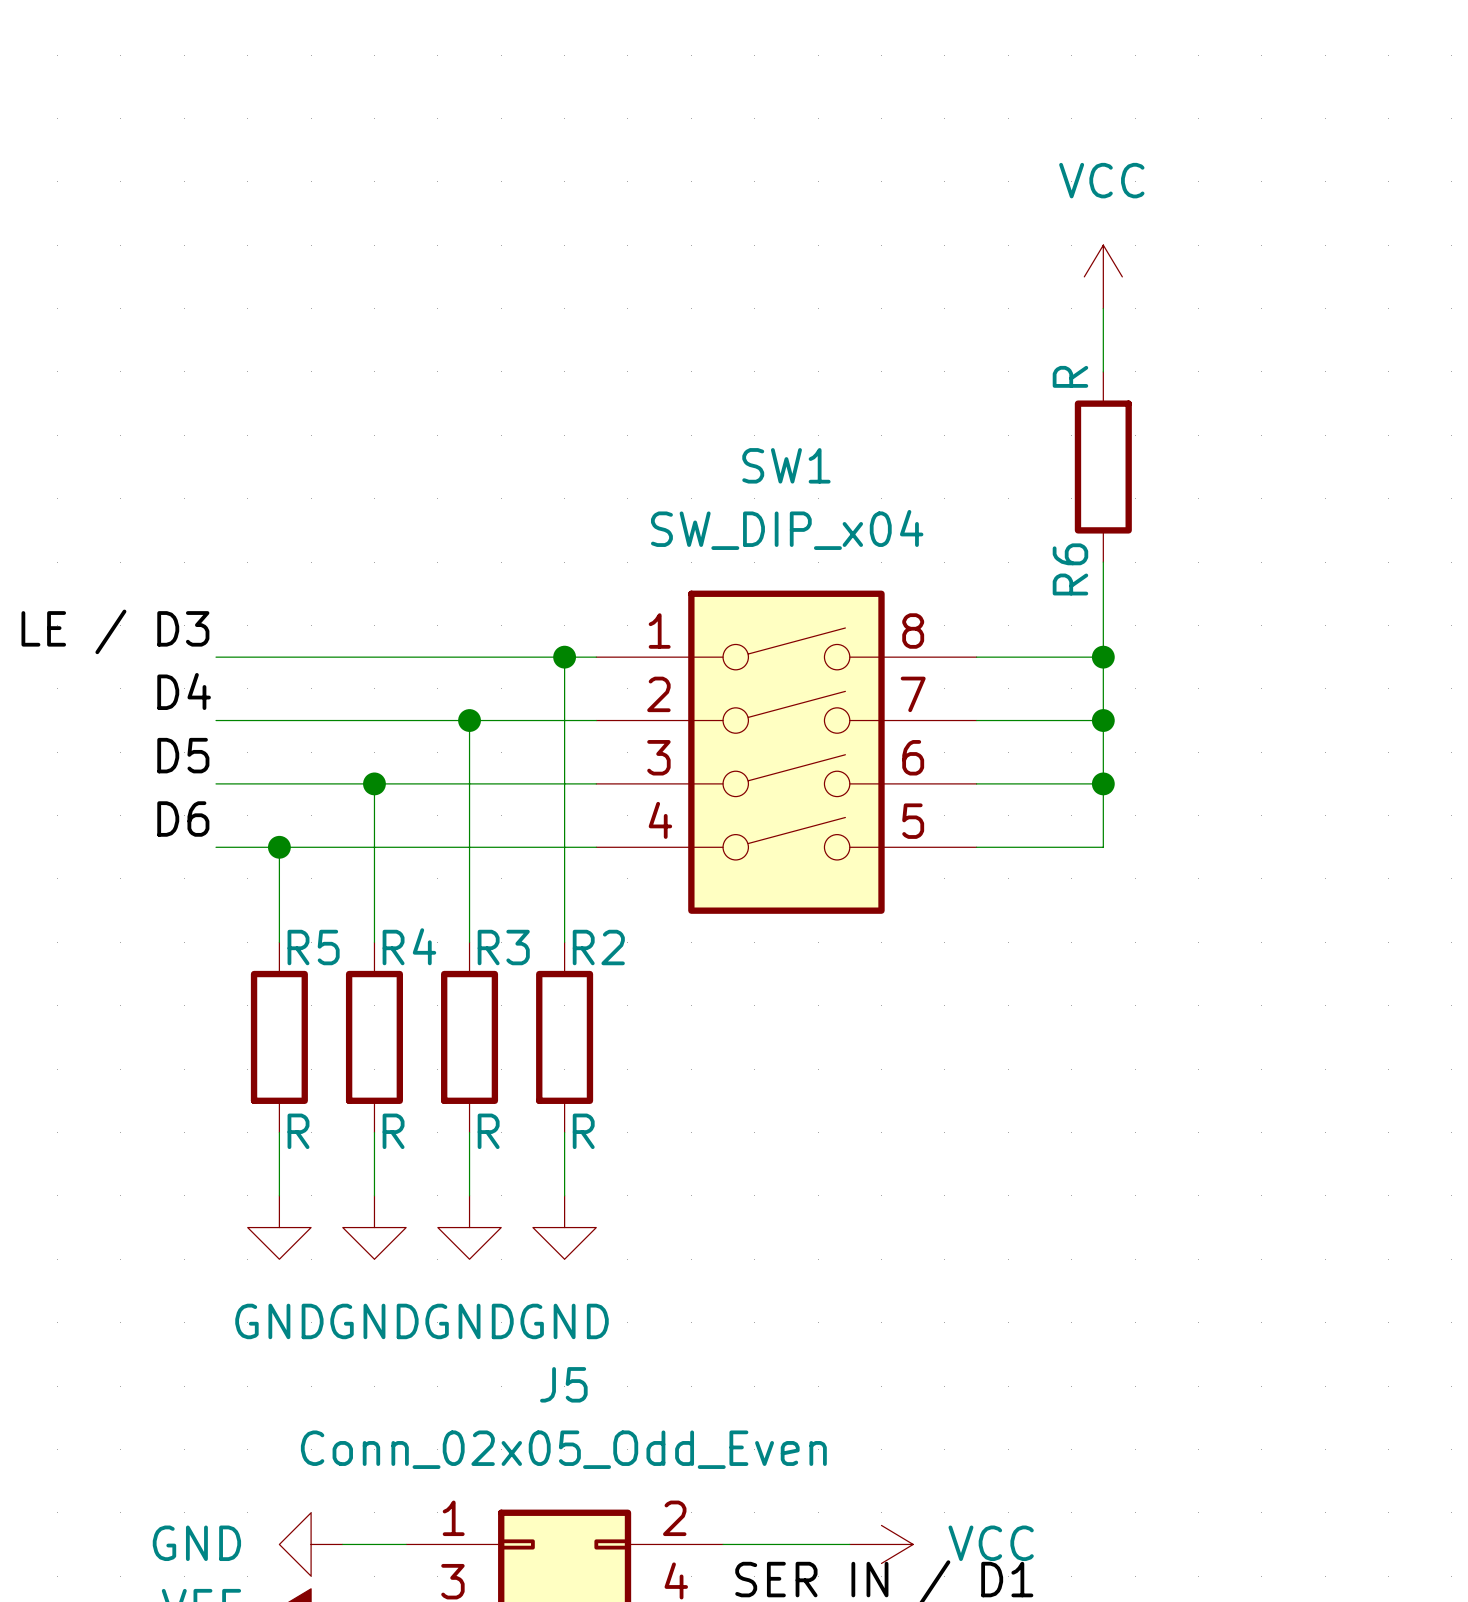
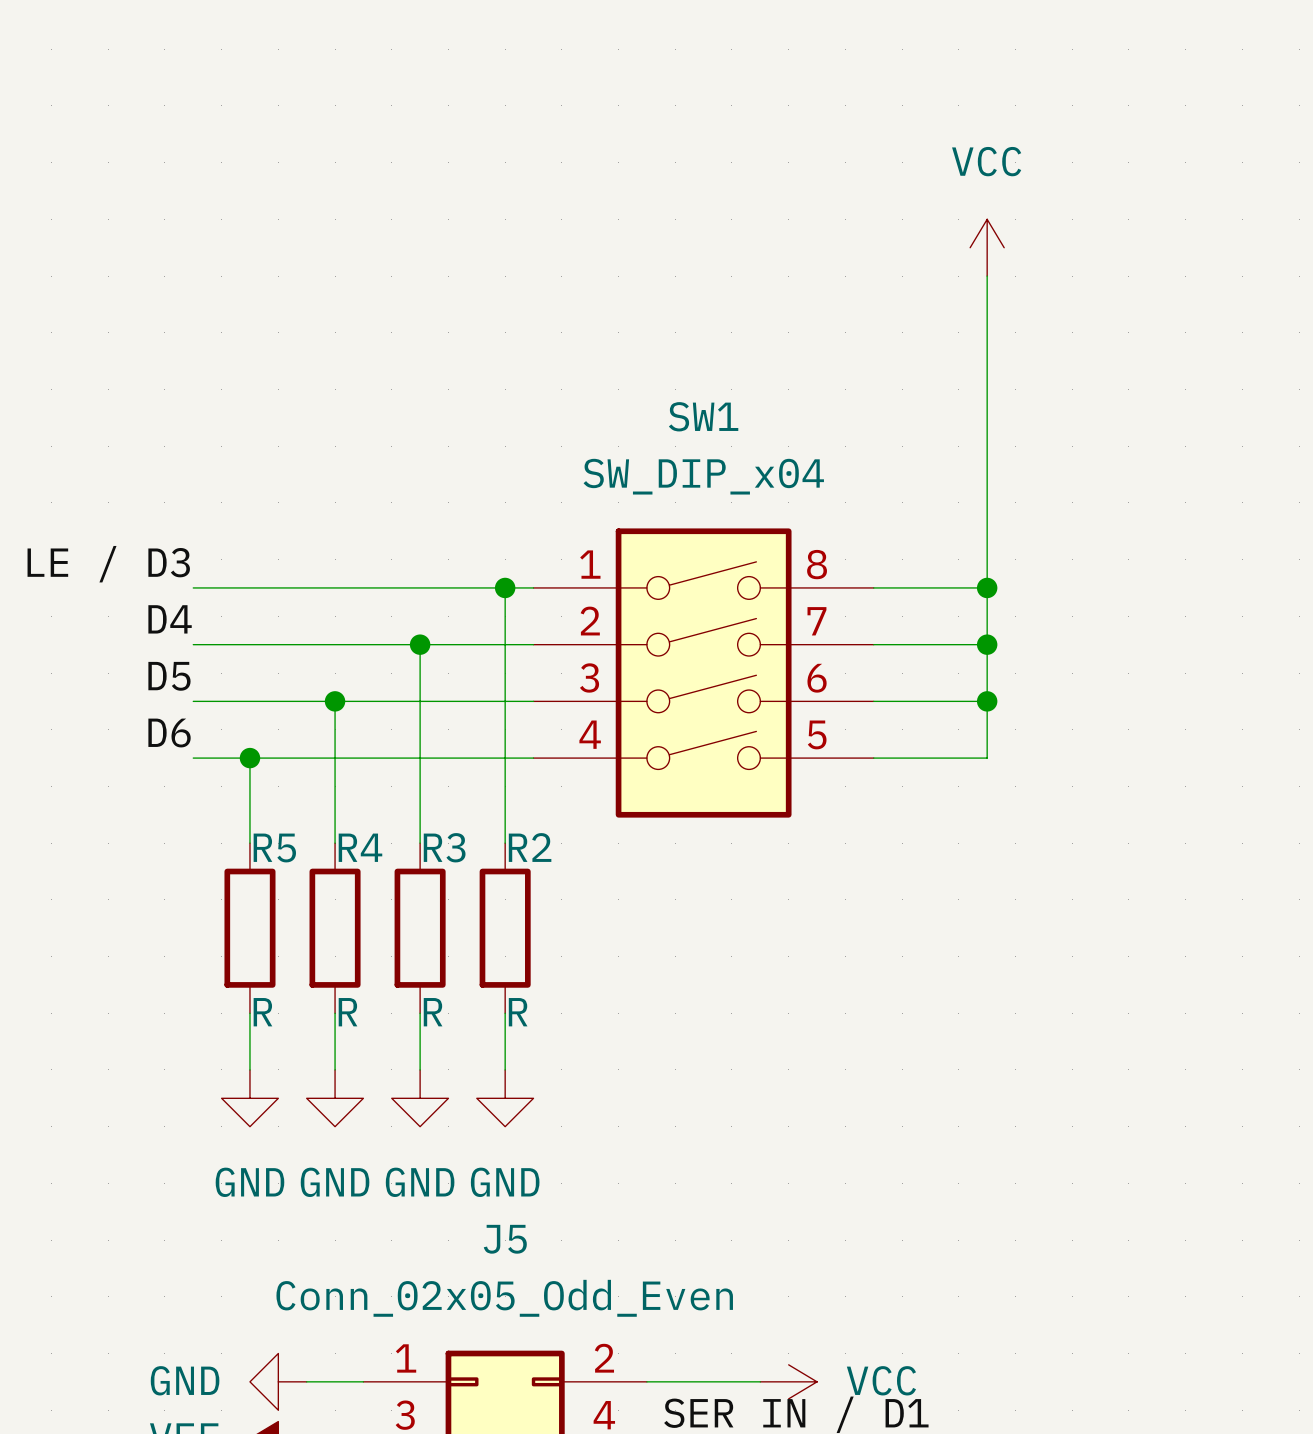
wire: none -> (987, 332) (987, 502)
R6: R (1103, 467) -> none

